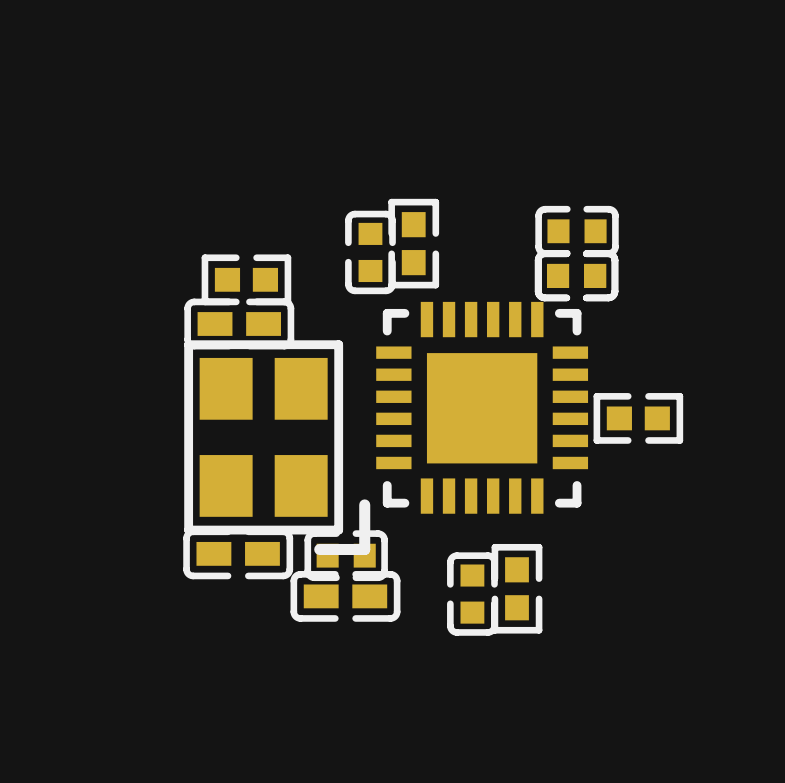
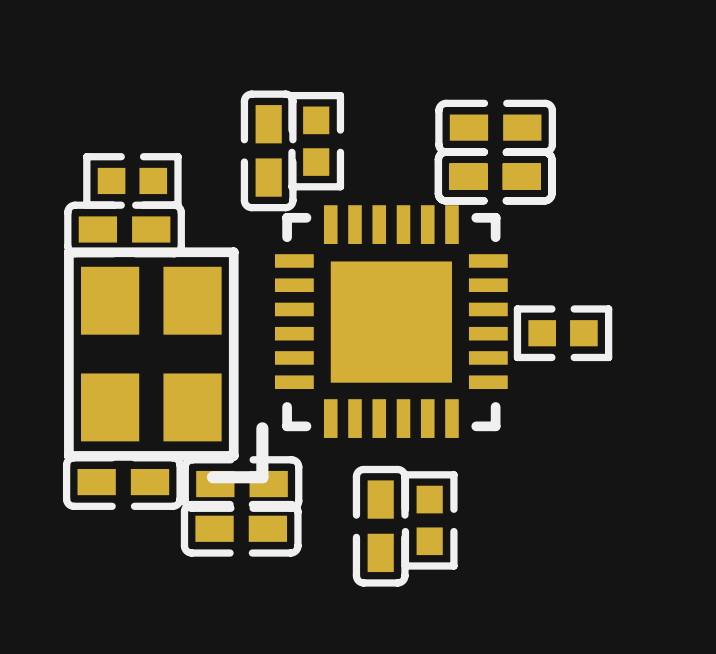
part footprint: [535, 205, 619, 257] -> [435, 99, 557, 156]
part footprint: [345, 210, 396, 295] -> [240, 90, 297, 212]
part footprint: [534, 250, 619, 302] -> [434, 148, 556, 205]
part footprint: [304, 530, 388, 582] -> [181, 456, 303, 512]
part footprint: [447, 552, 498, 636] -> [352, 465, 409, 587]

